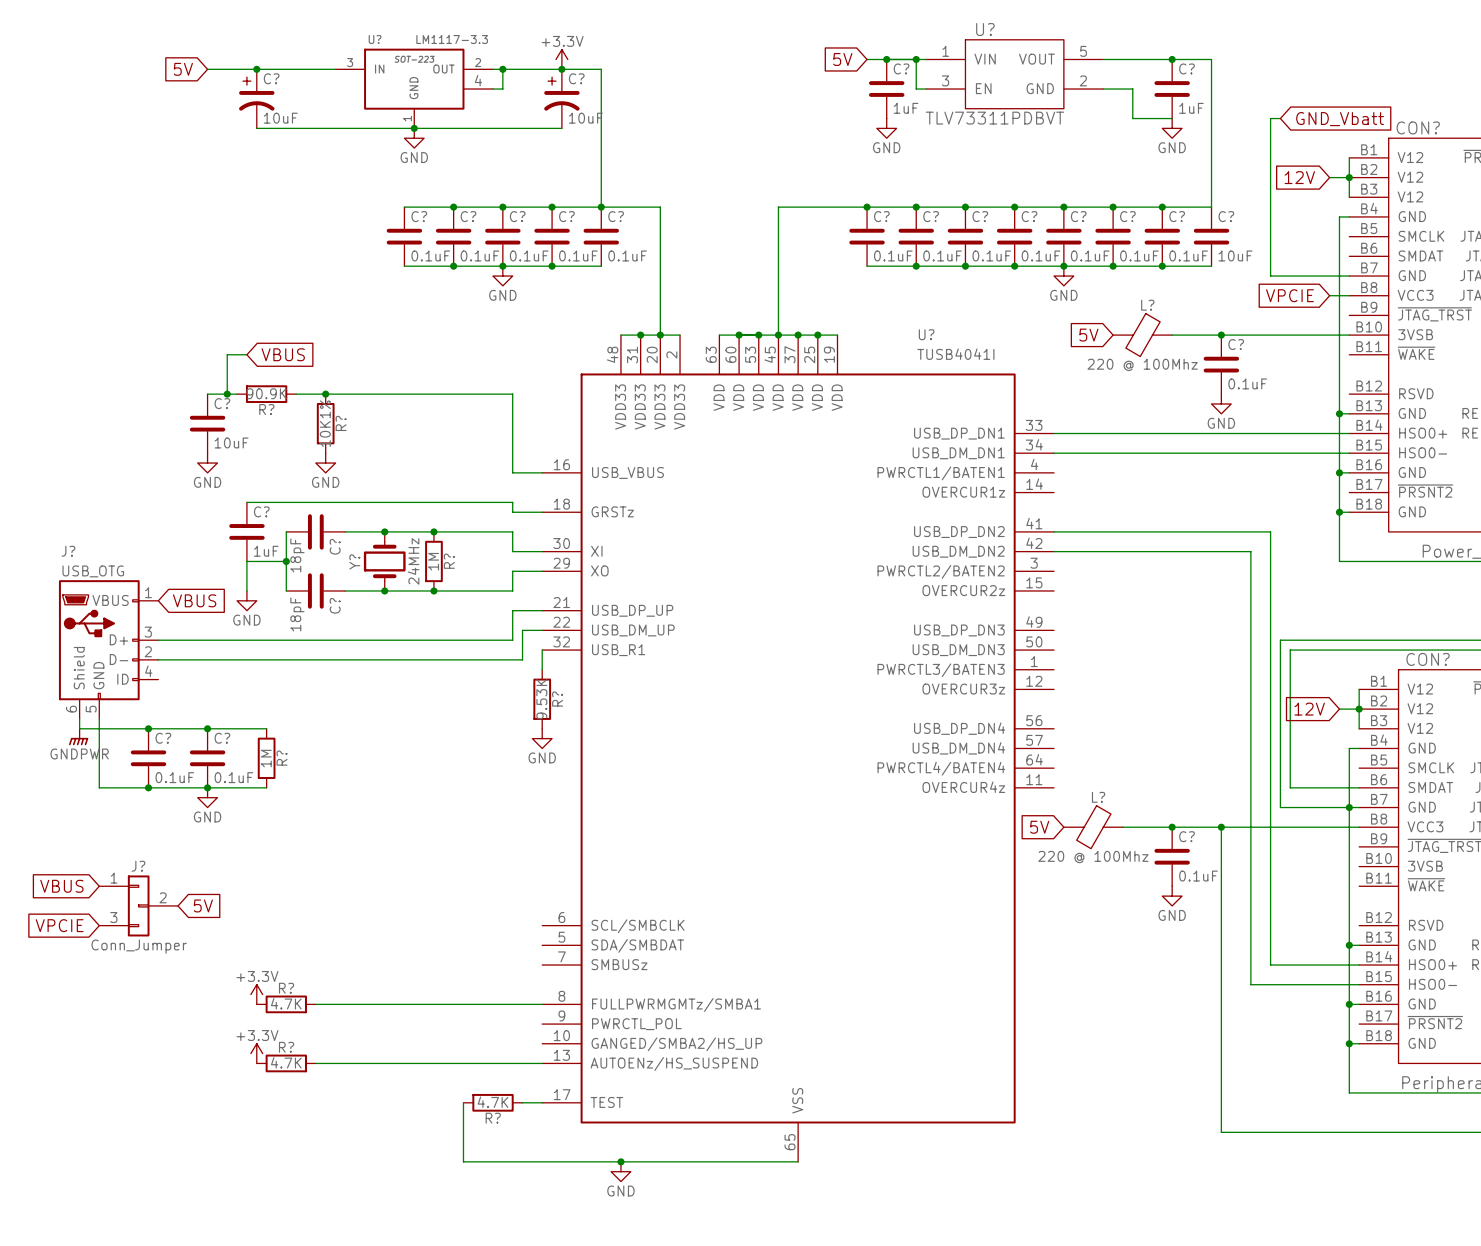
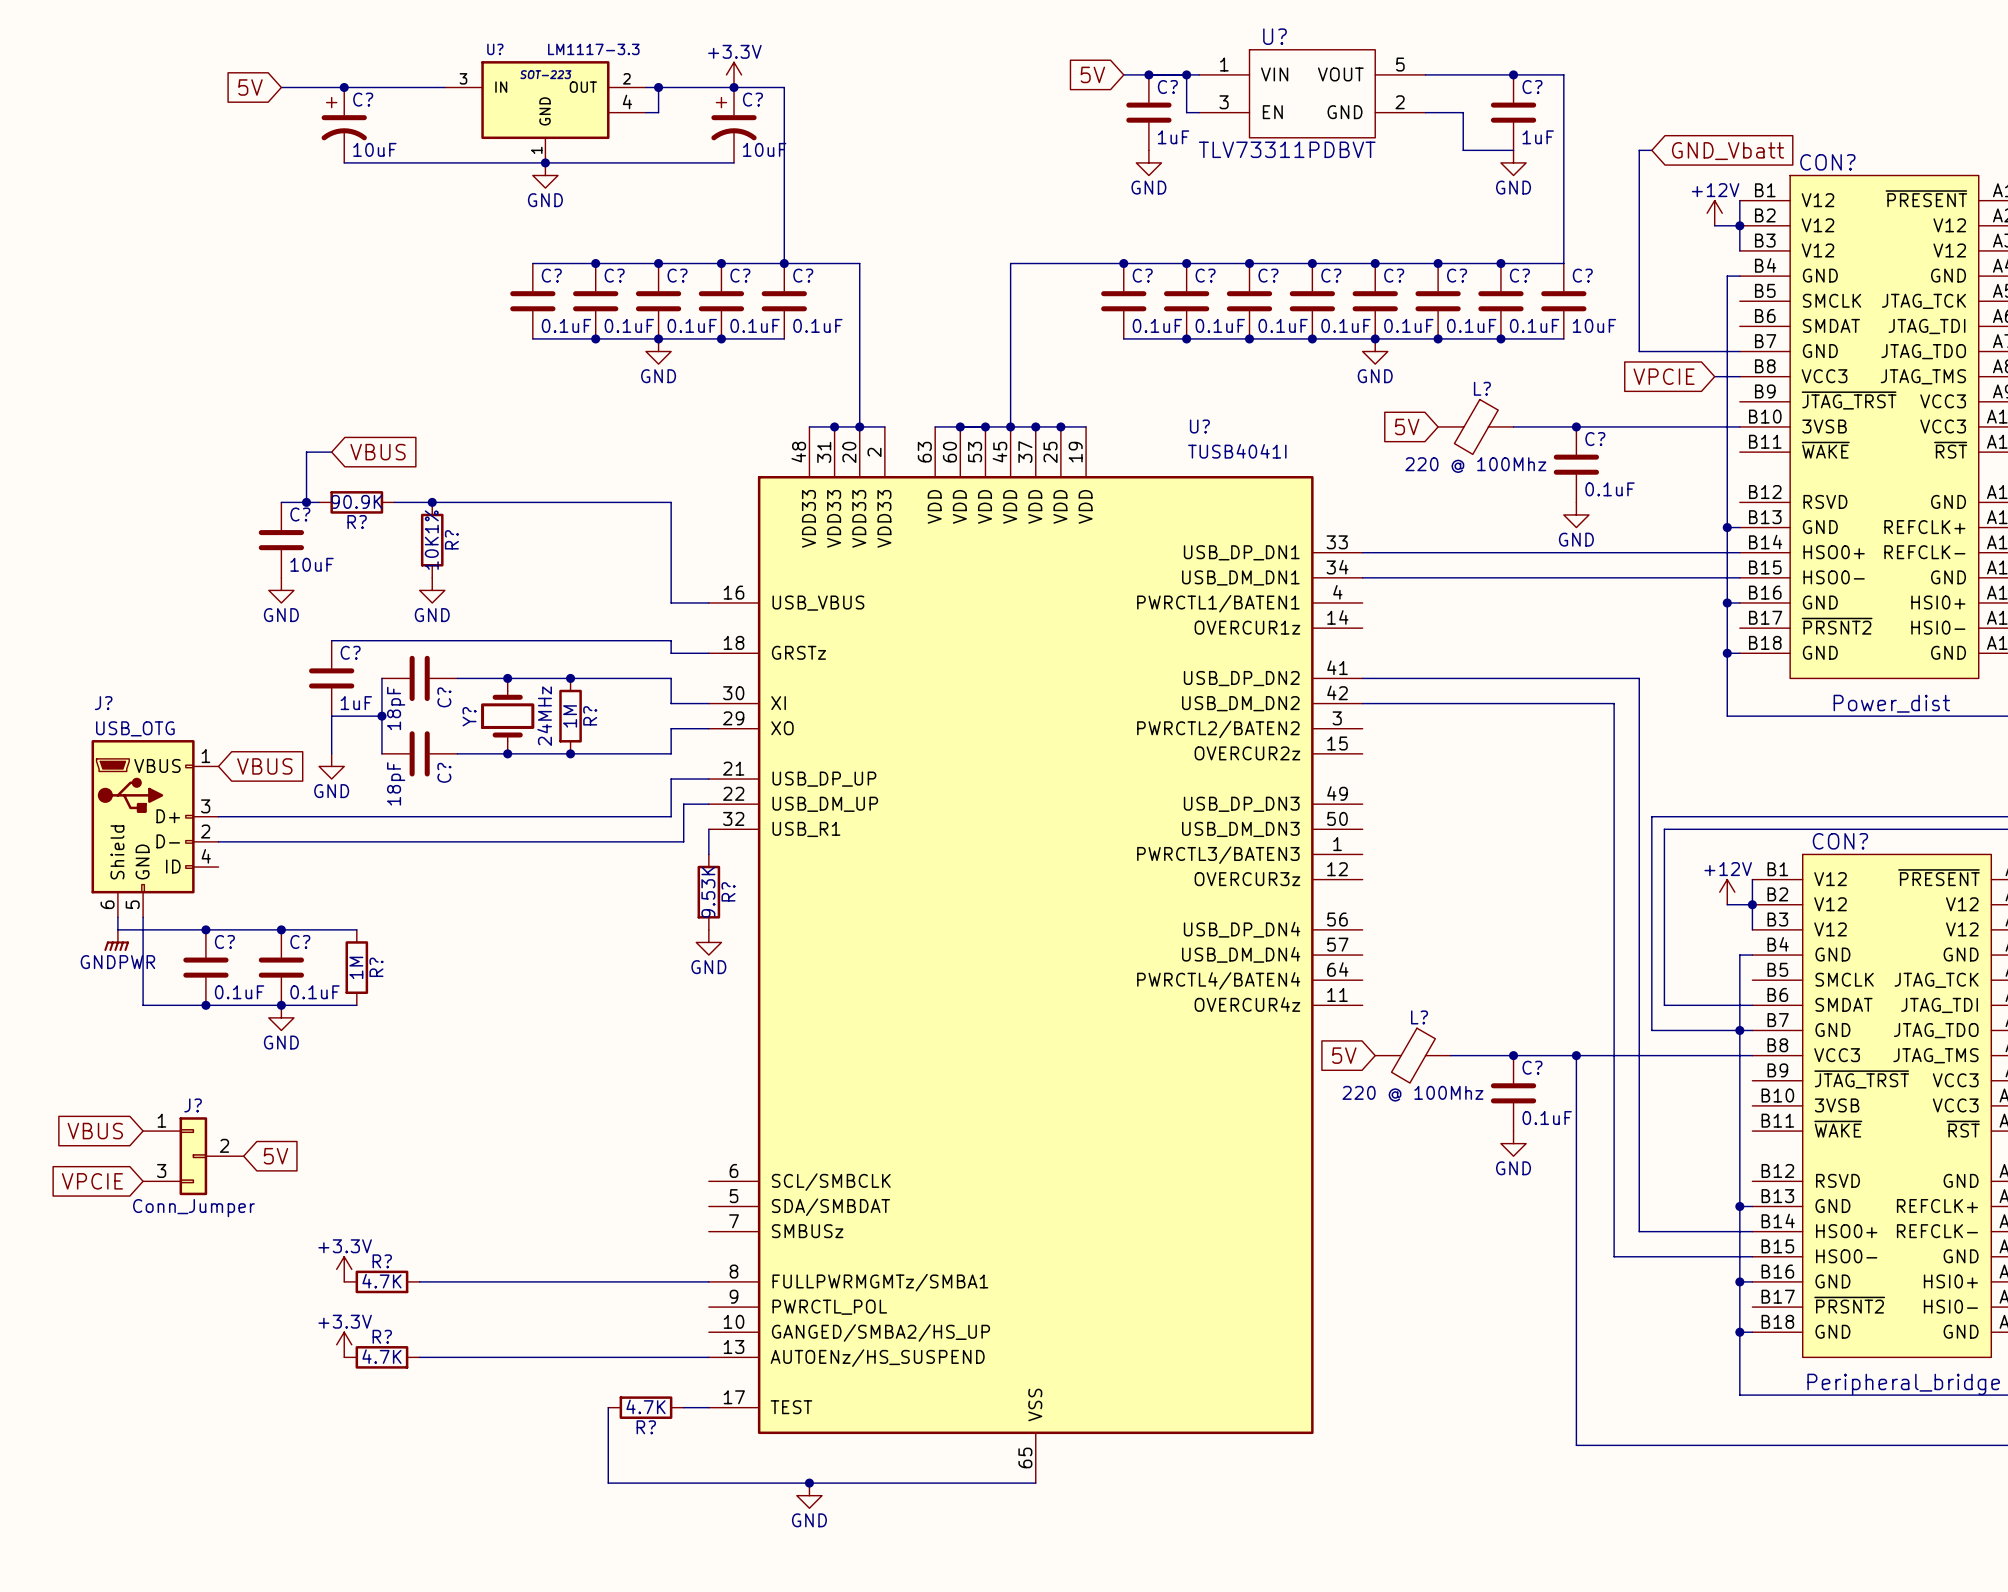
power symbol: none -> +12V (1714, 213)
global label: 12V (1299, 177) -> none
power symbol: none -> +12V (1727, 892)
global label: 12V (1309, 709) -> none

